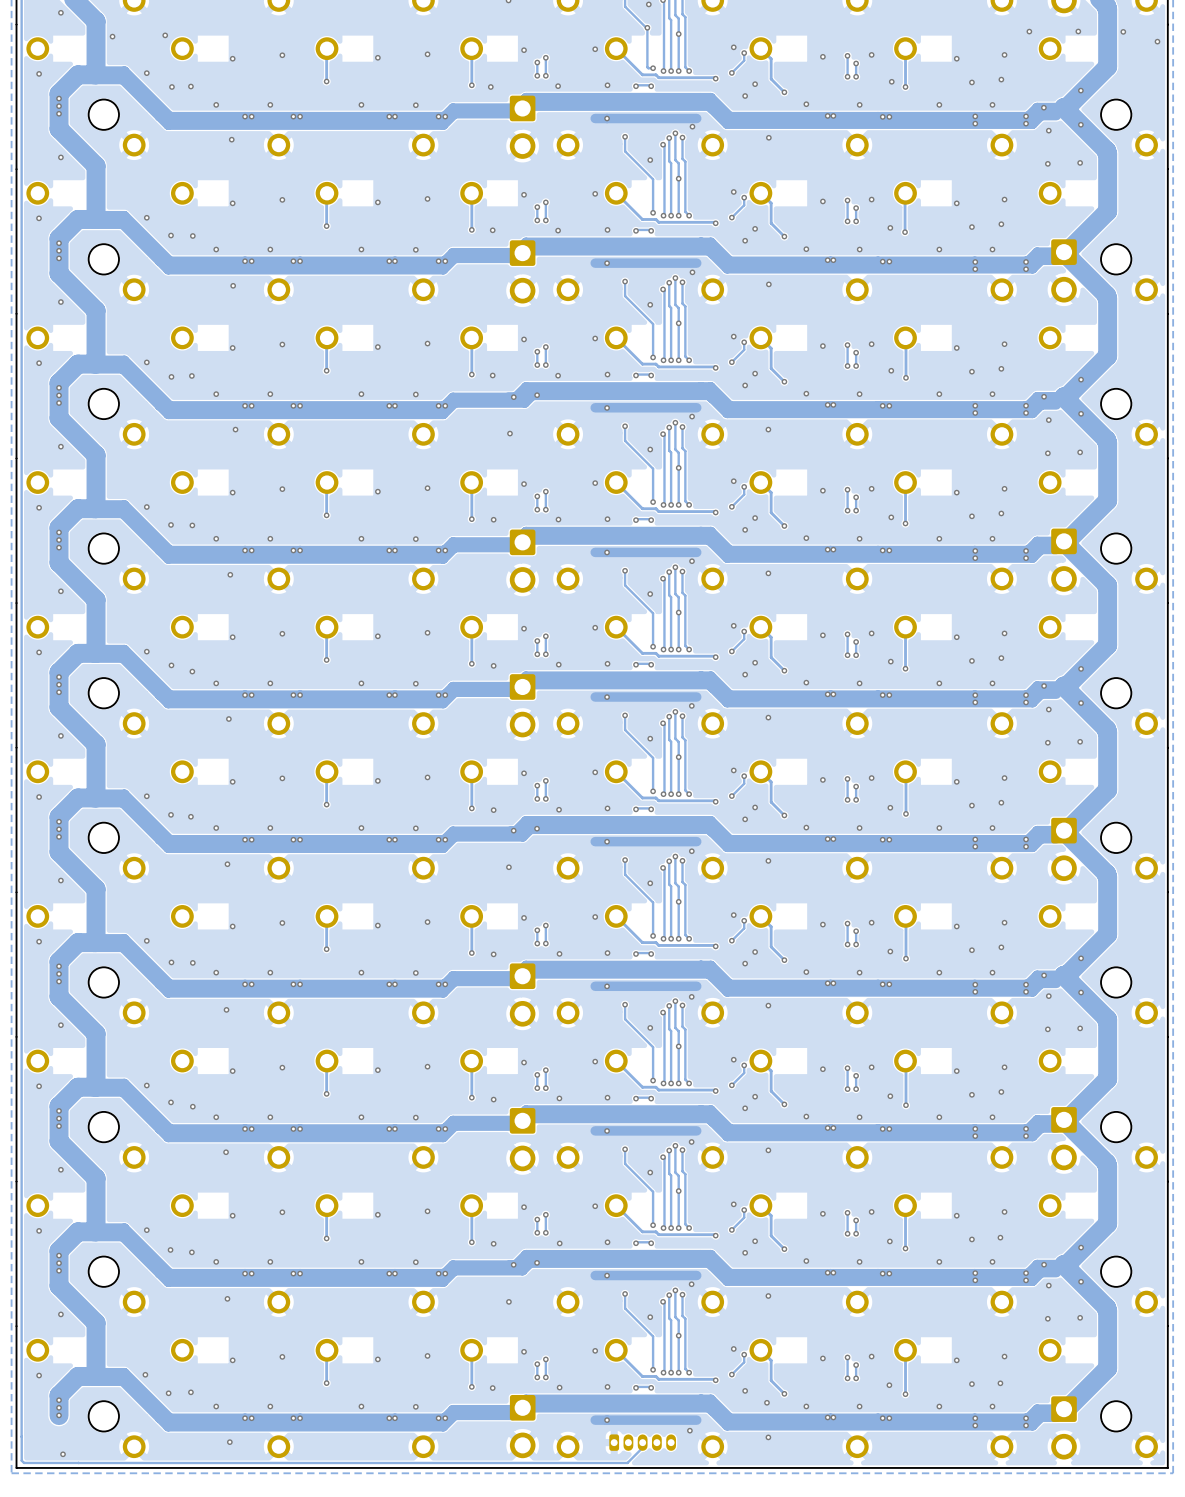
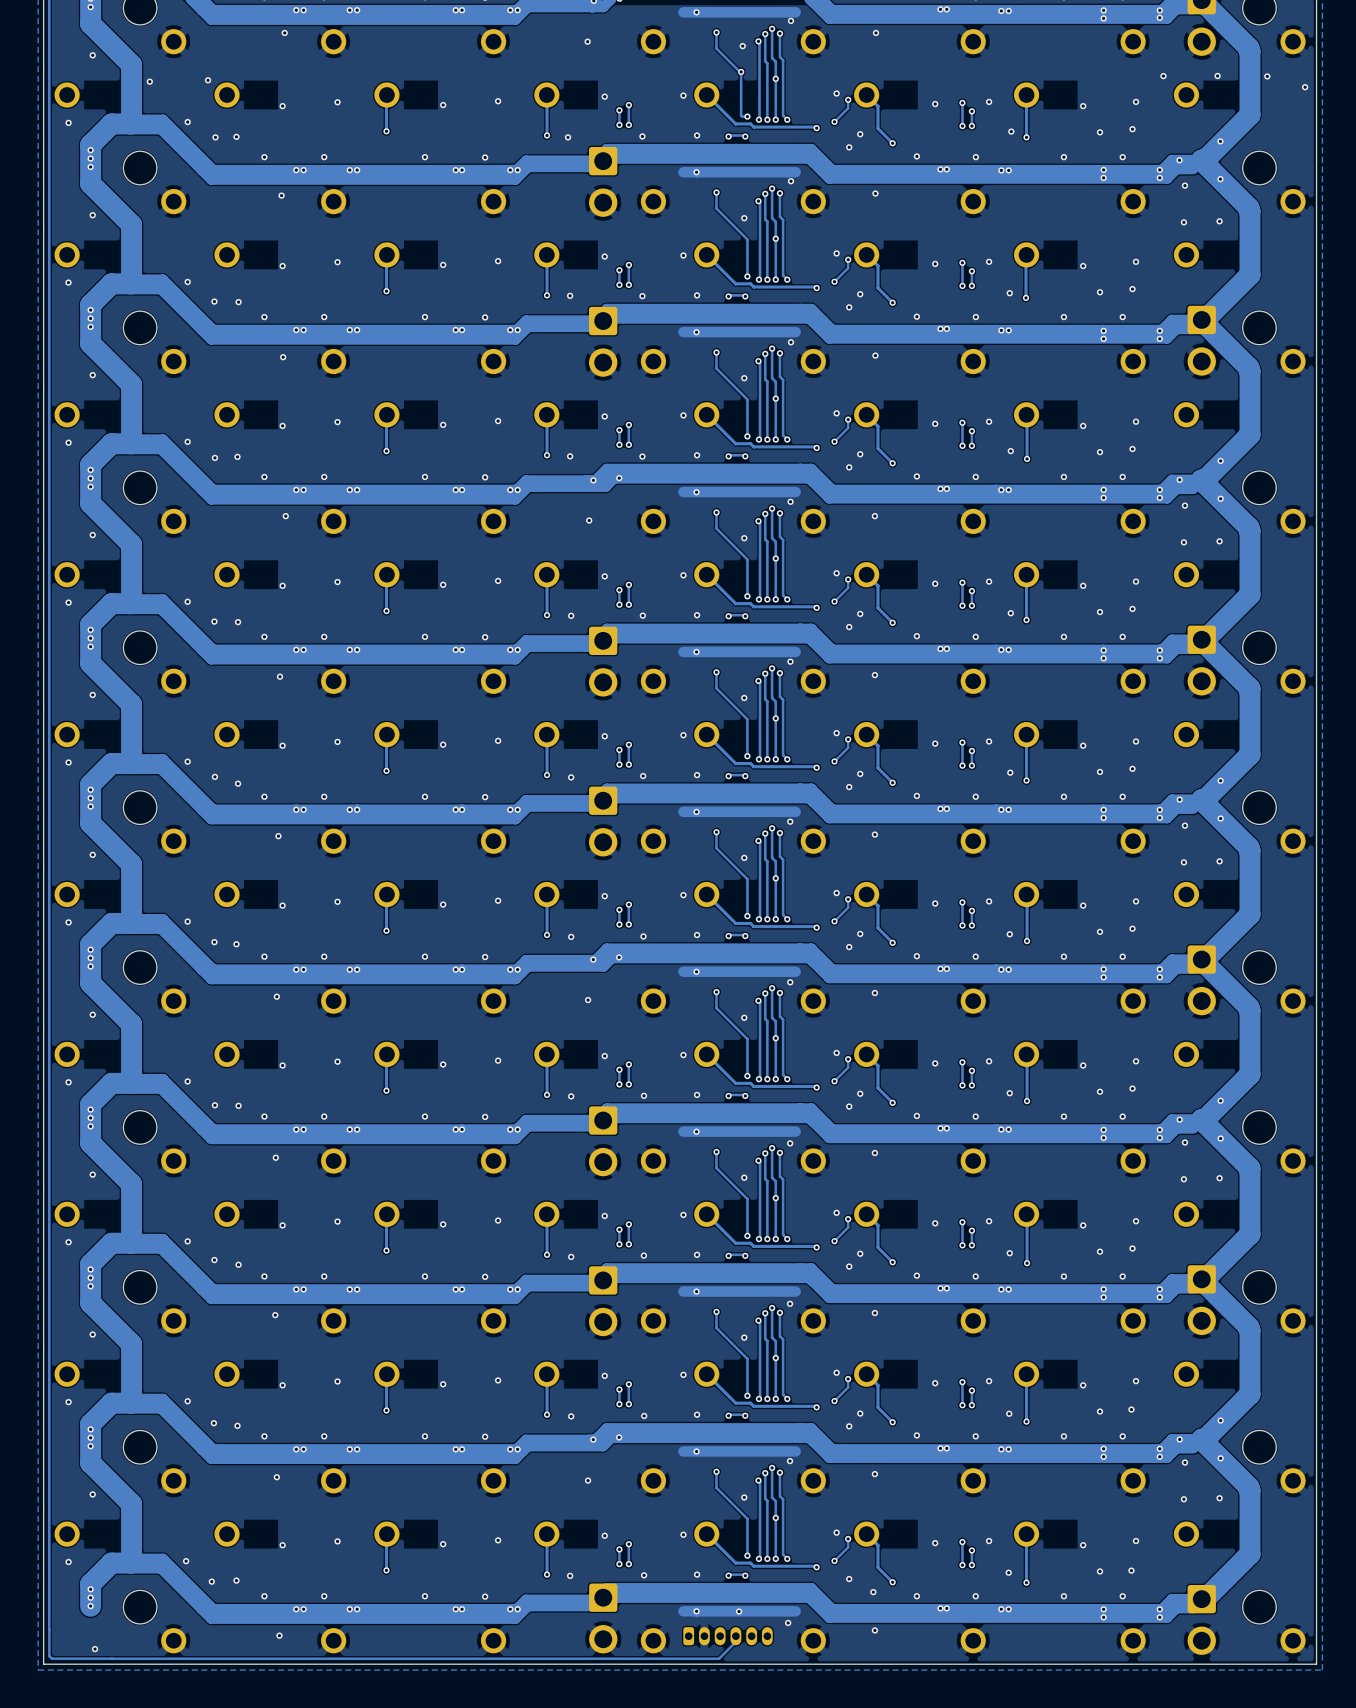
via: none -> (739, 1611)
part footprint: [609, 1434, 677, 1451] -> [683, 1627, 773, 1646]

